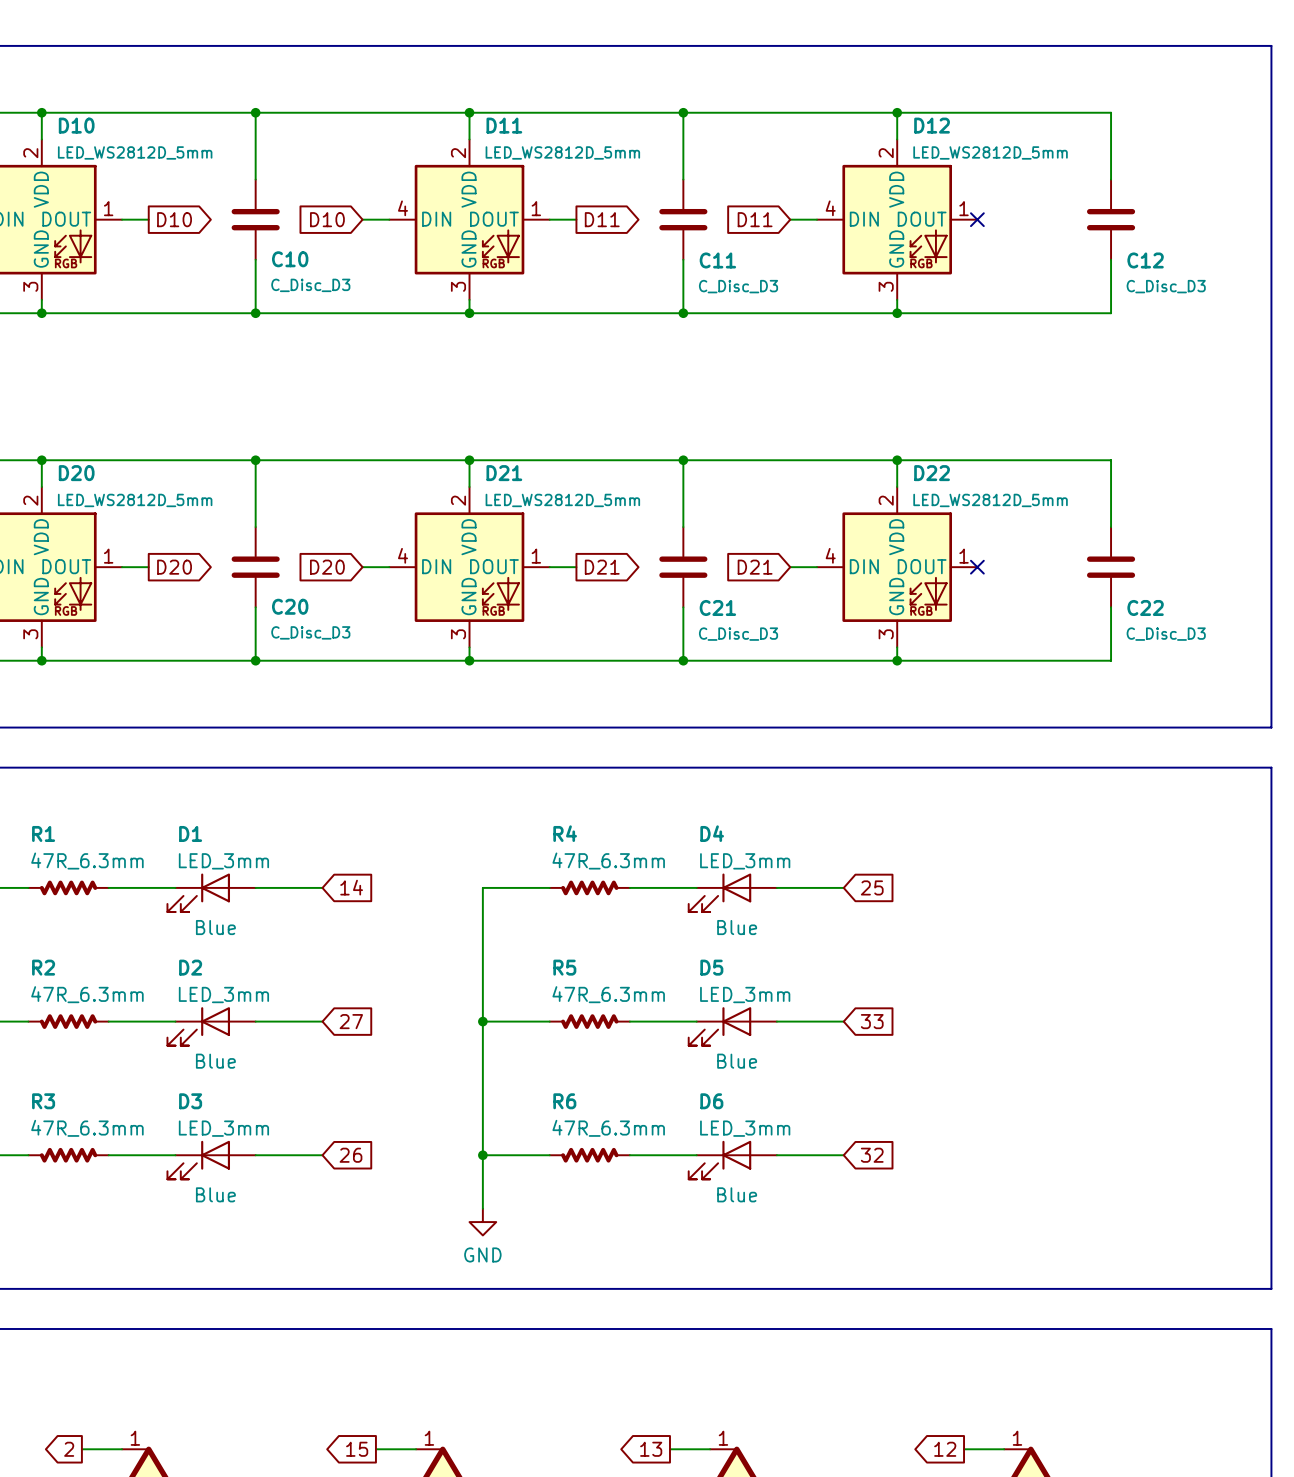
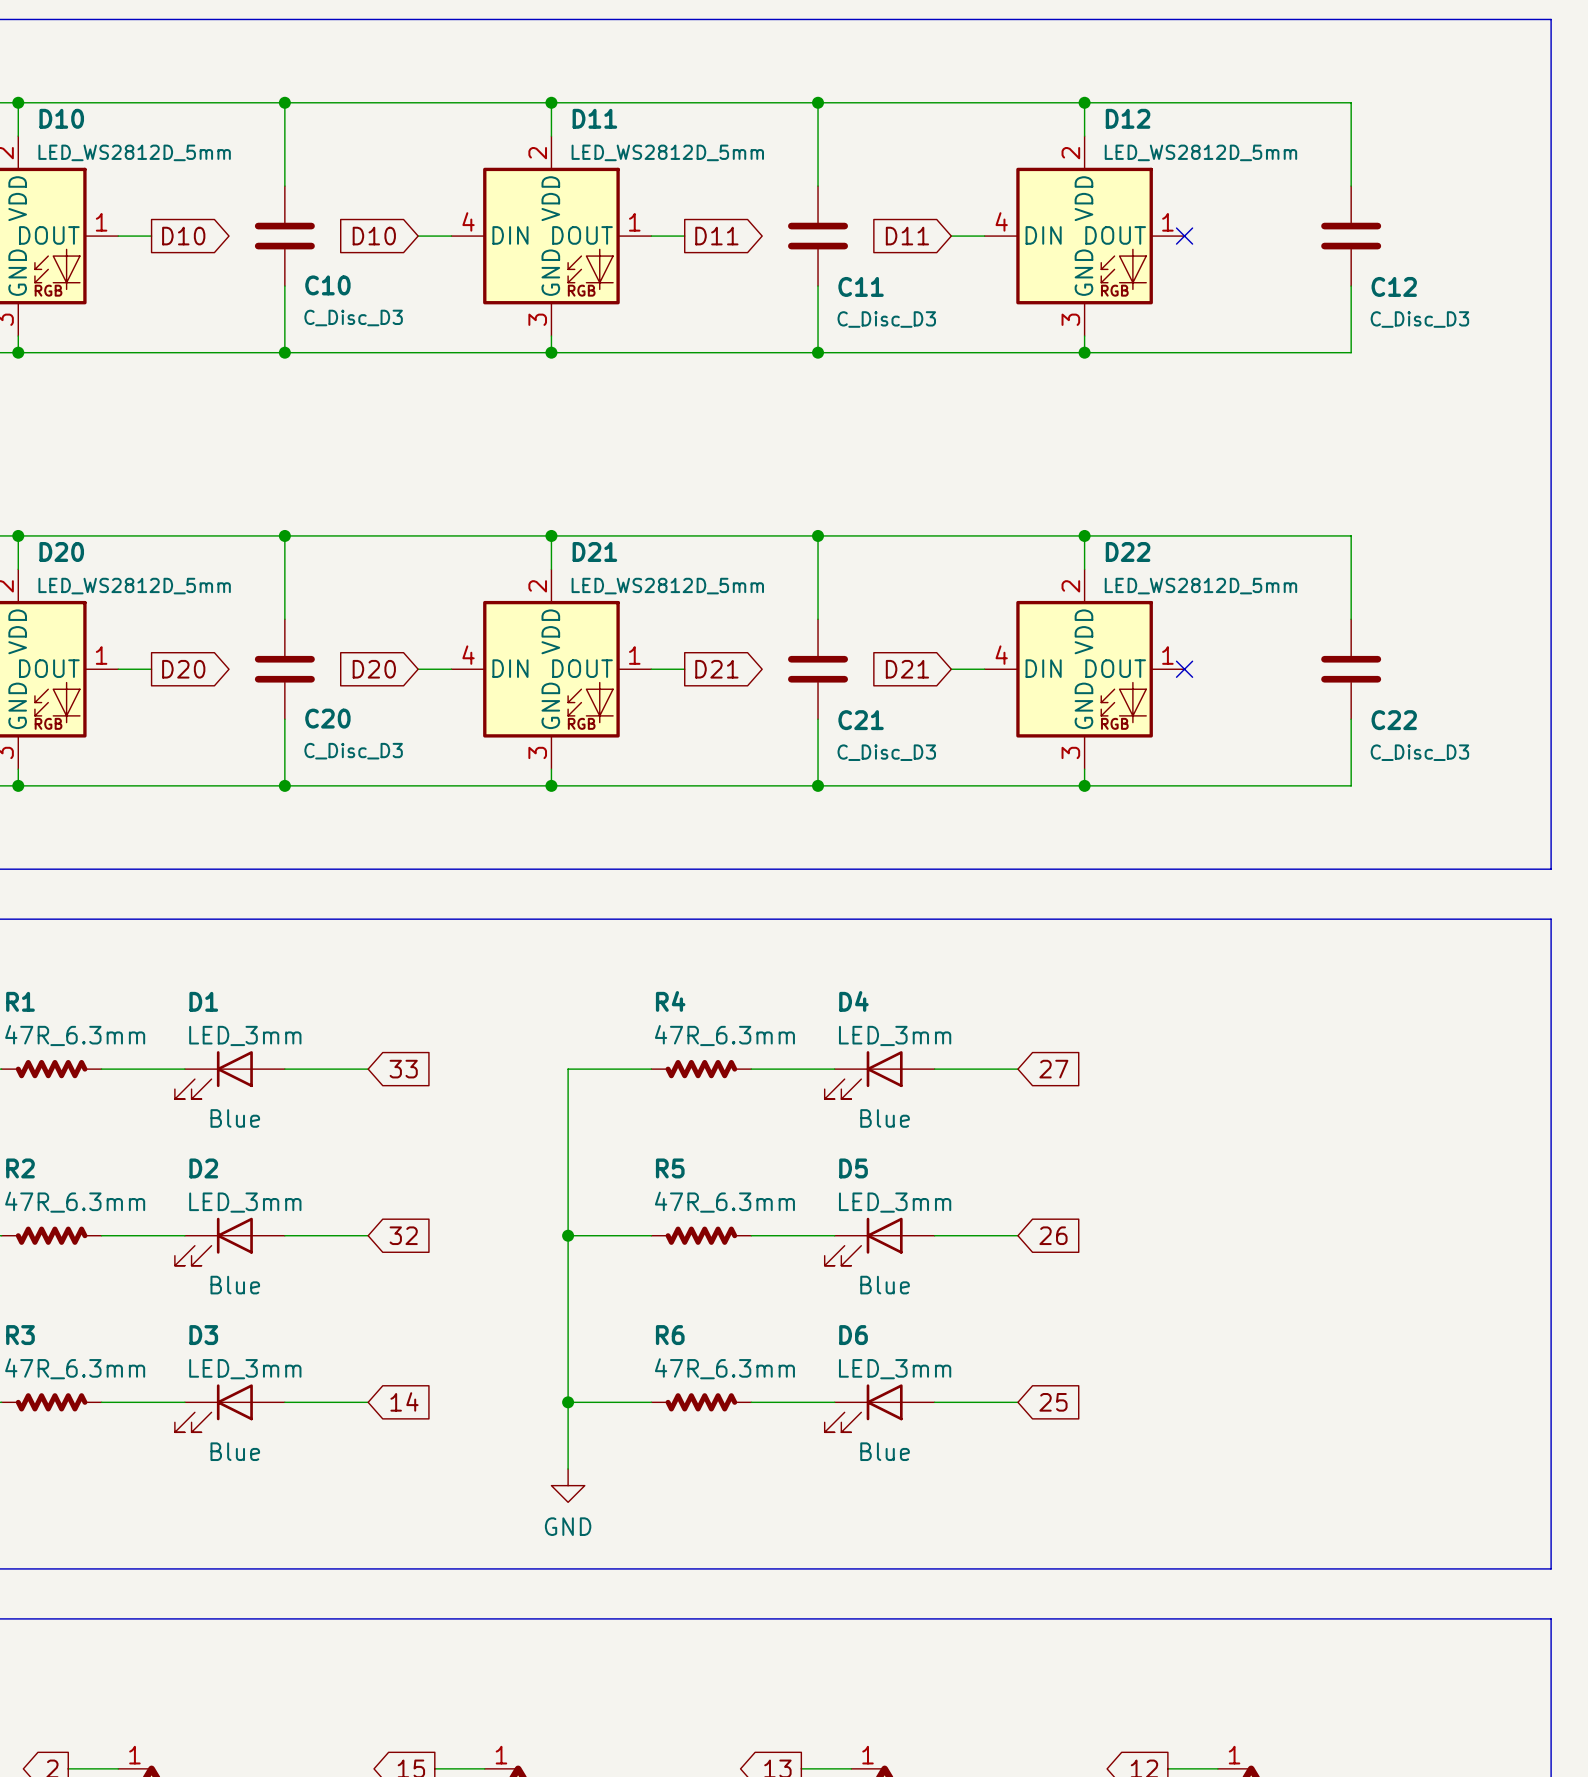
global label: 14 (351, 887) -> 33 (403, 1069)
global label: 25 (872, 887) -> 27 (1053, 1069)
global label: 27 (351, 1021) -> 32 (403, 1235)
global label: 33 (872, 1021) -> 26 (1053, 1235)
global label: 26 (350, 1155) -> 14 (404, 1401)
global label: 32 (872, 1155) -> 25 (1053, 1402)

